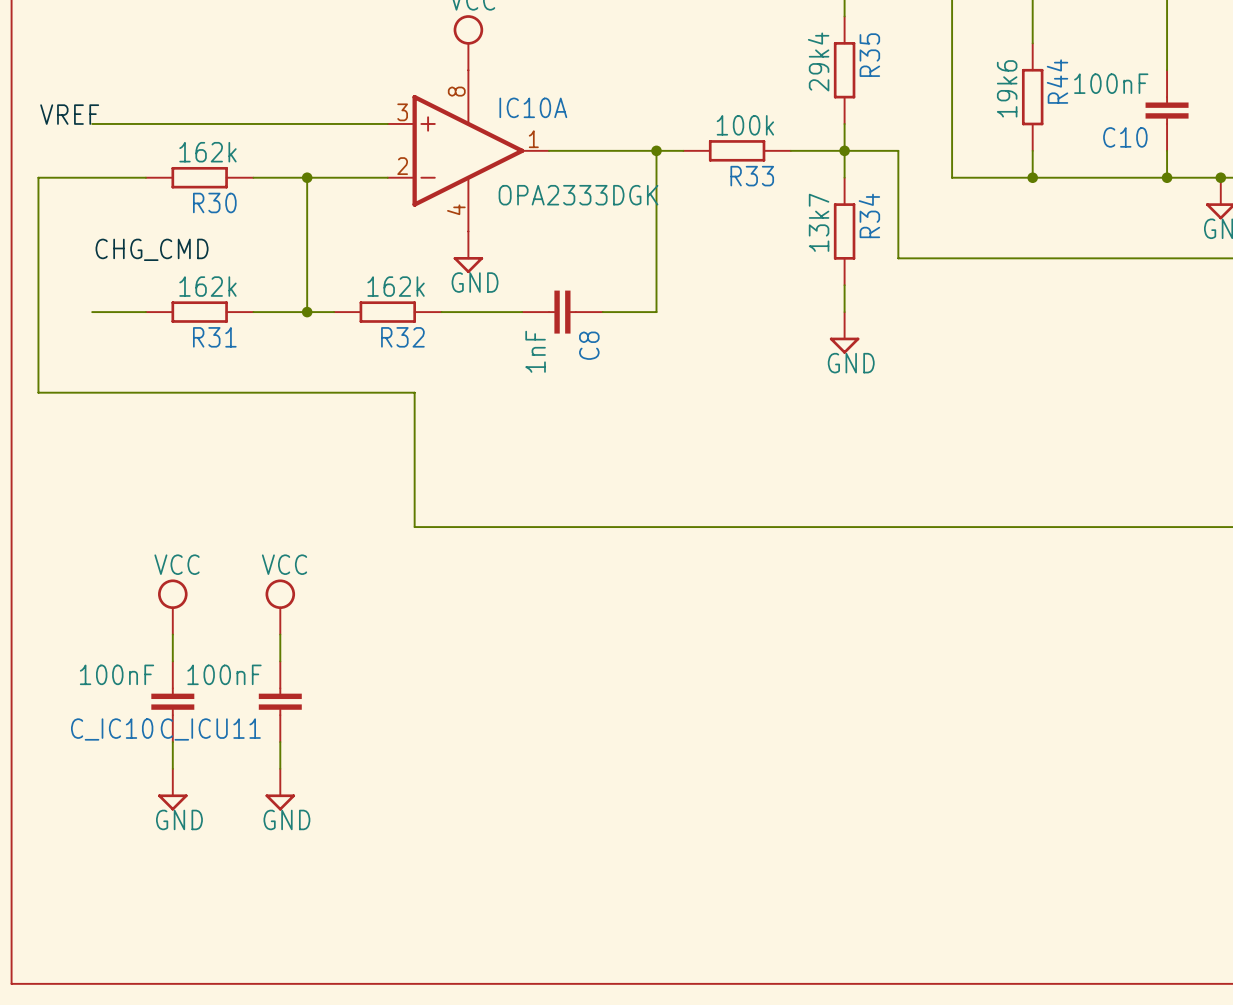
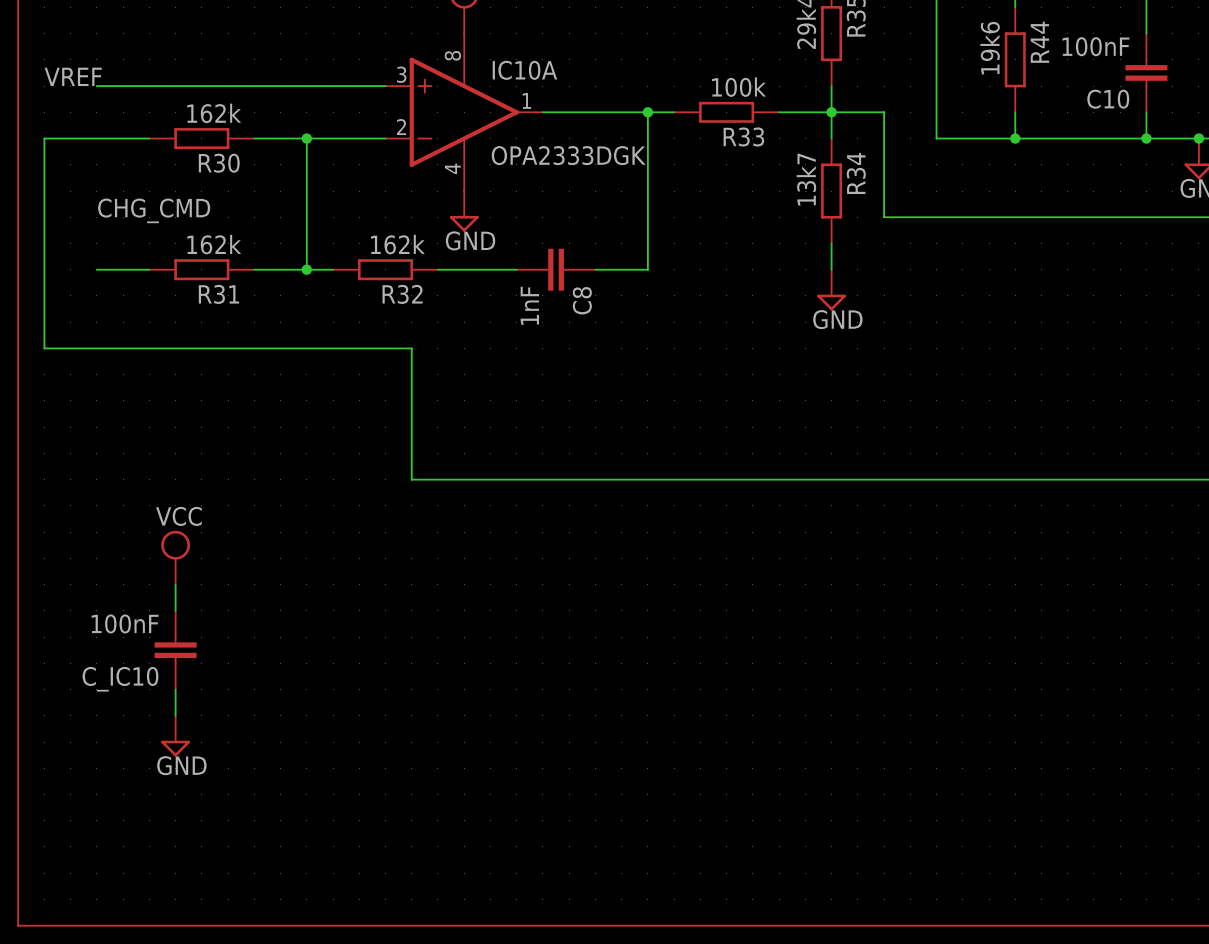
power symbol: VCC (280, 607) -> none
wire: (280, 634) (280, 661) -> none
C_ICU11: 100nF (280, 701) -> none
wire: (280, 742) (280, 768) -> none
power symbol: GND (280, 789) -> none

